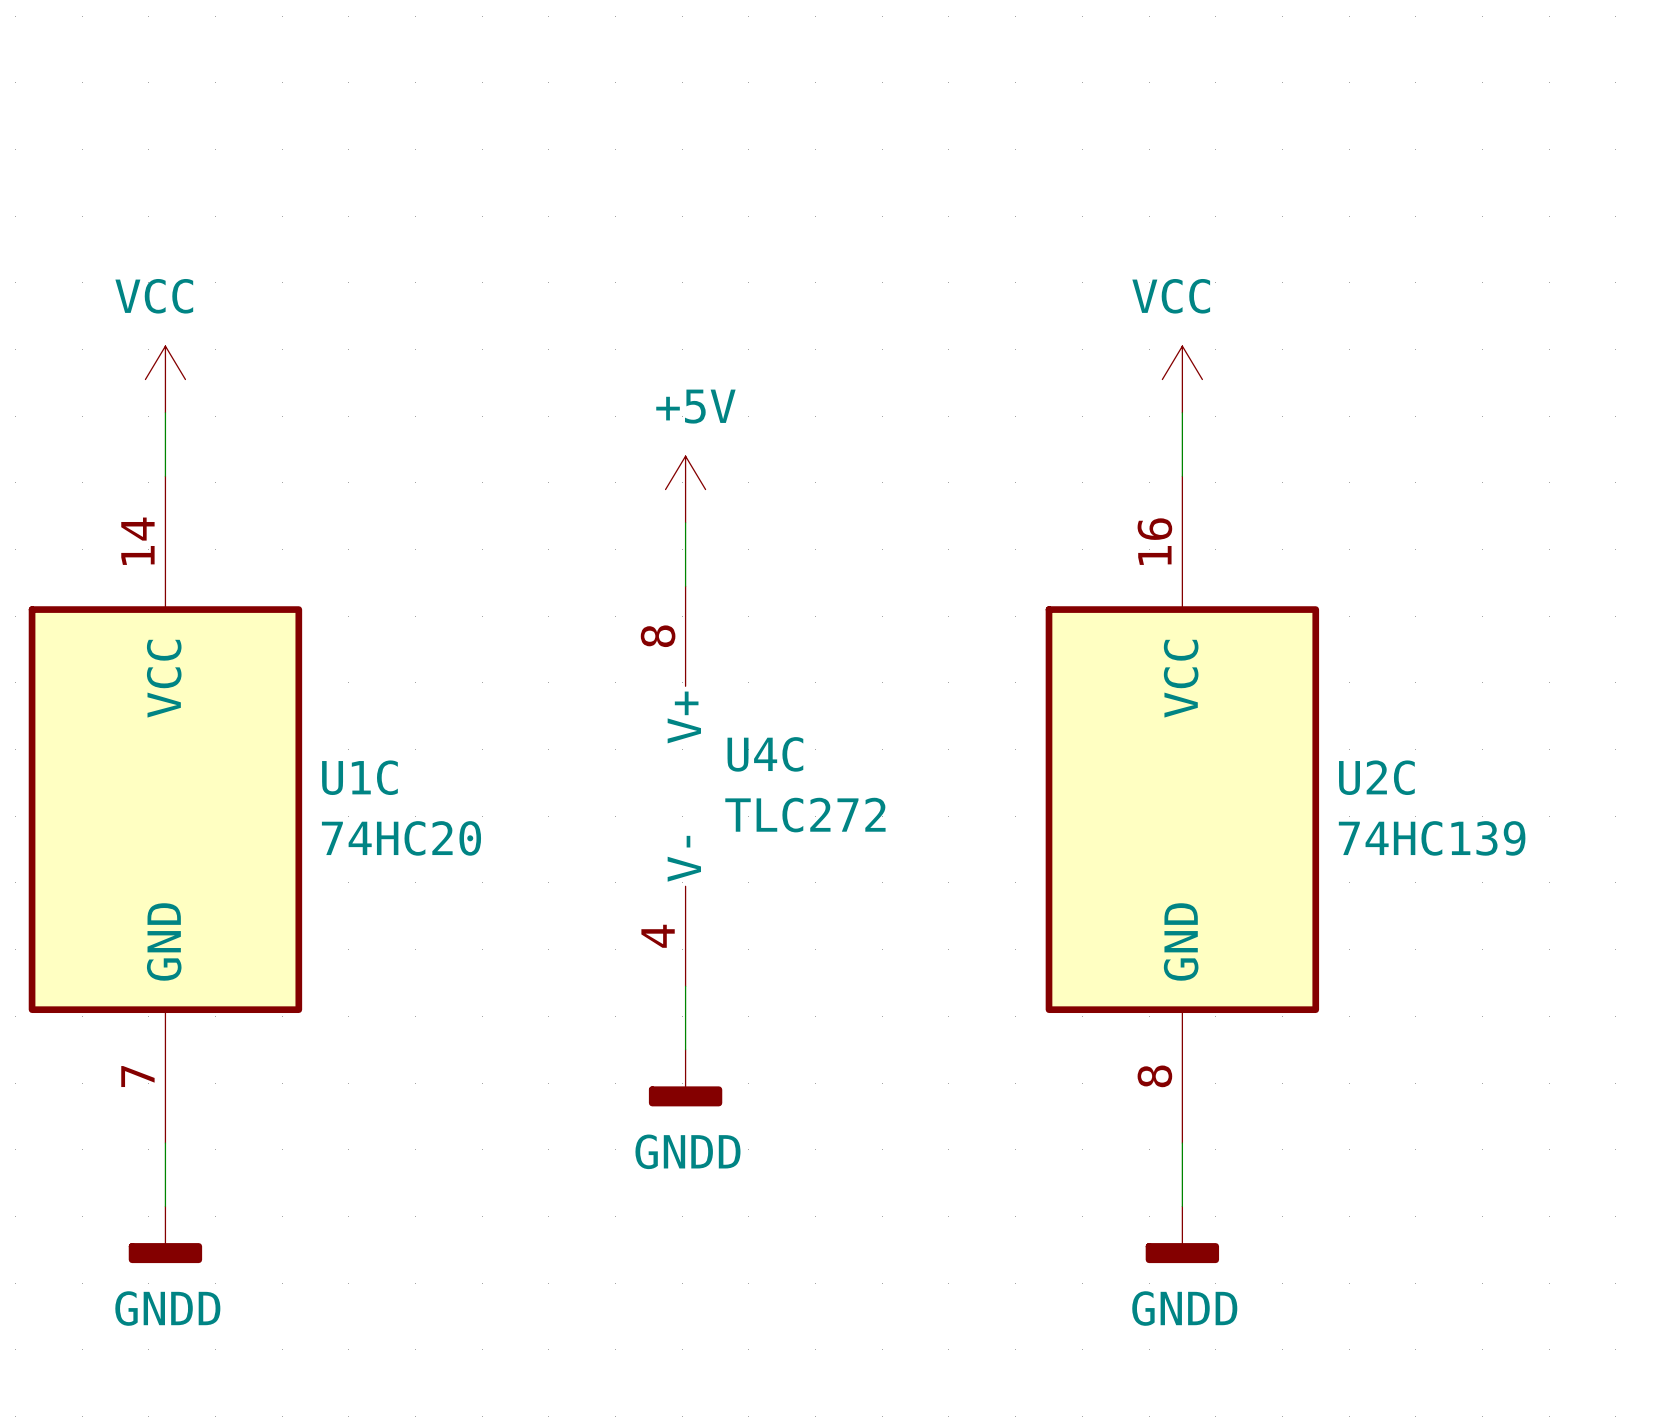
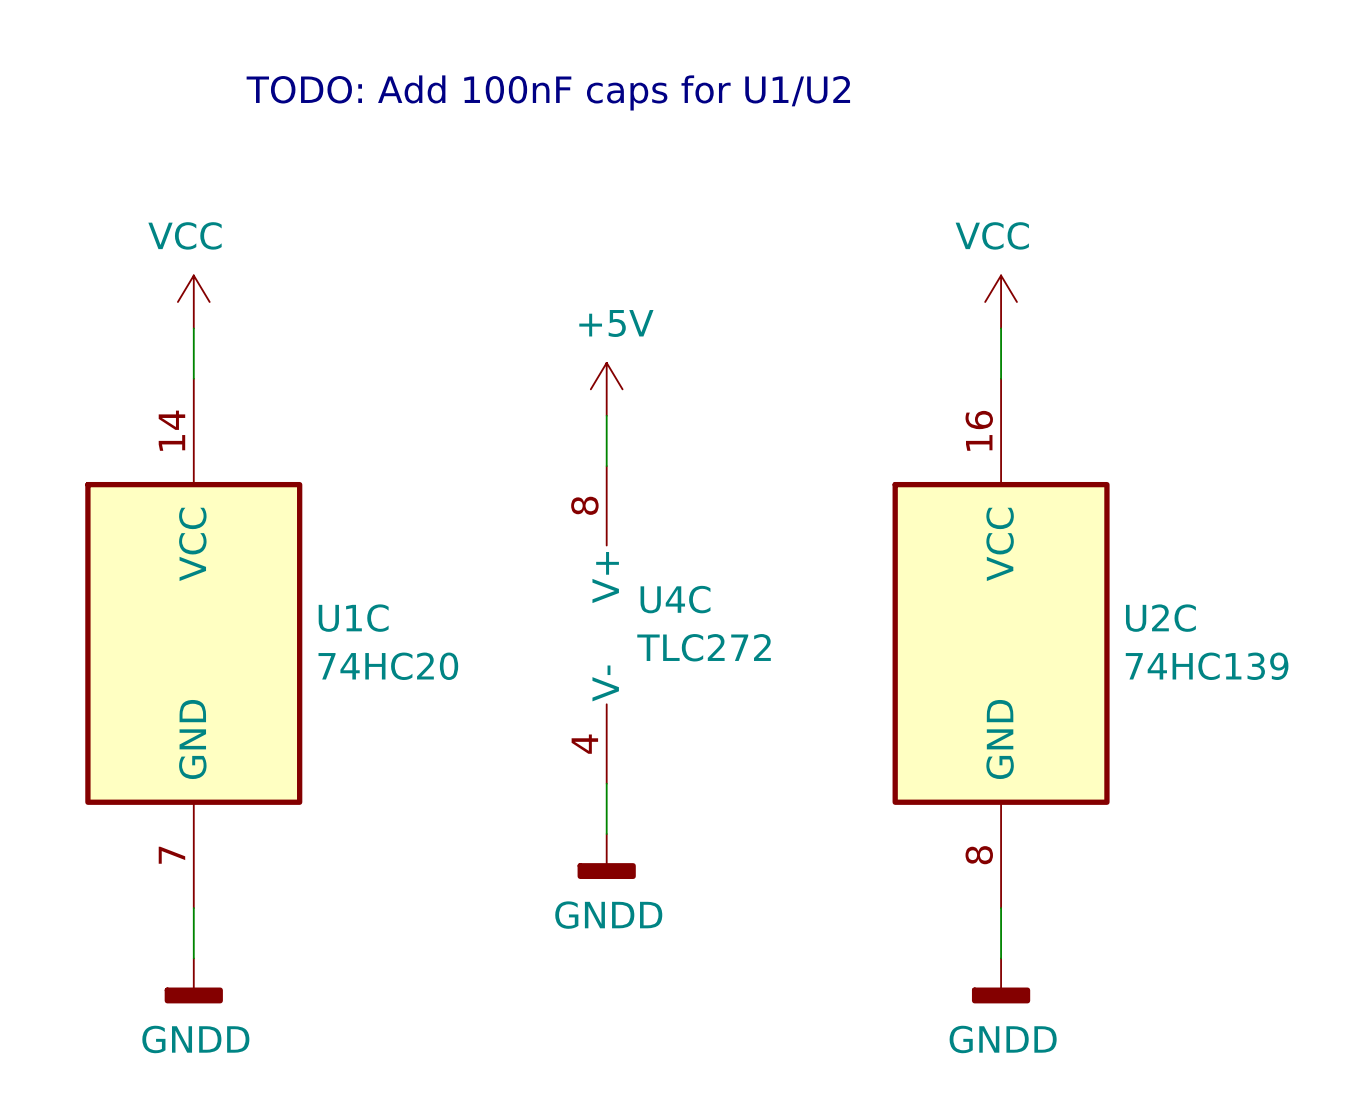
text: none -> TODO: Add 100nF caps for U1/U2 (548, 92)

